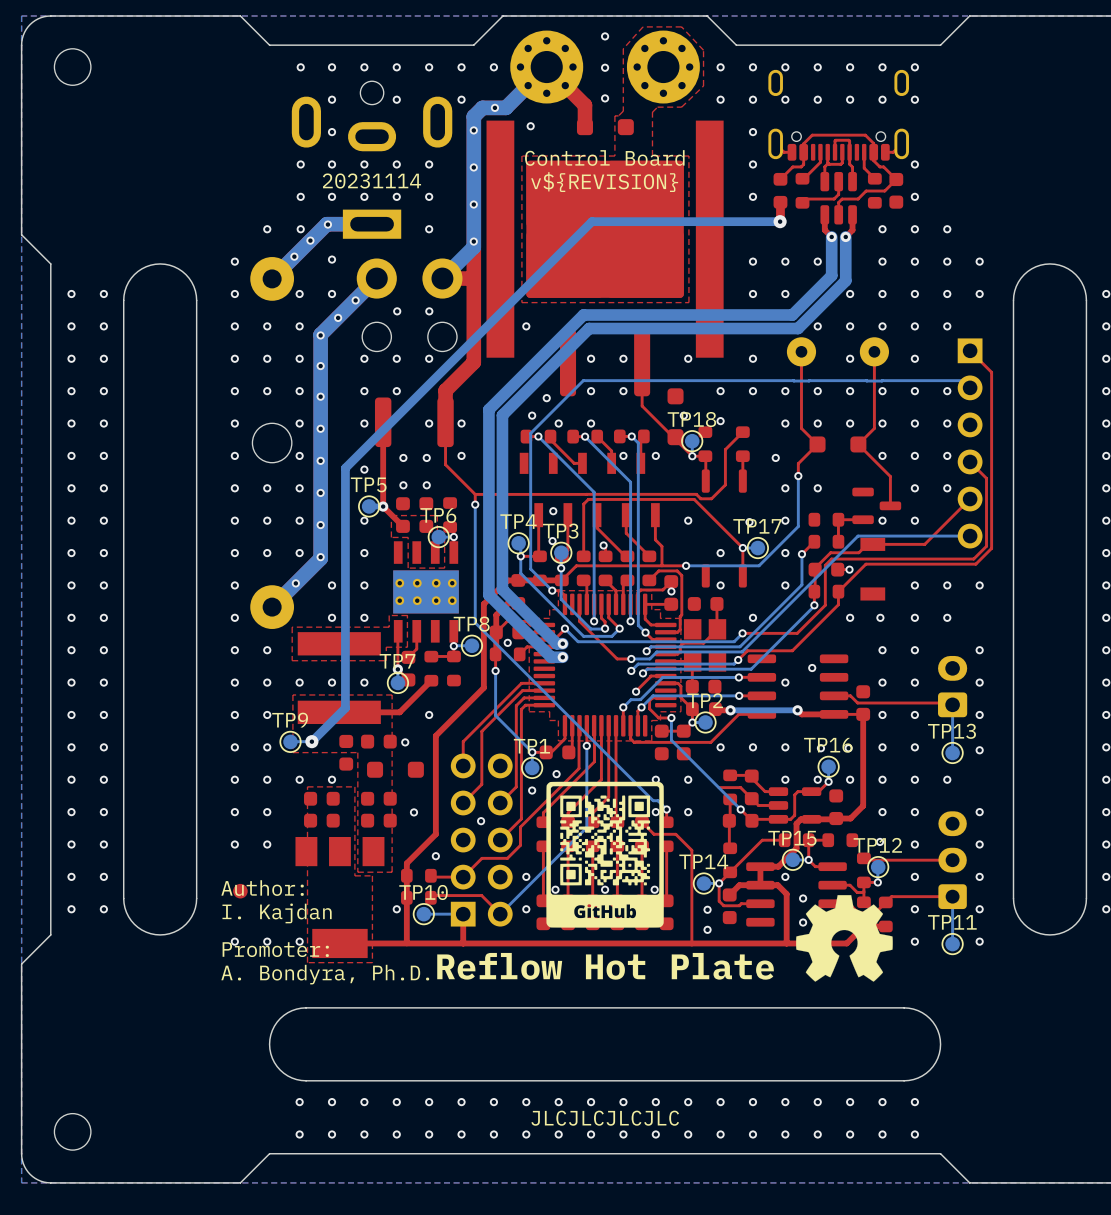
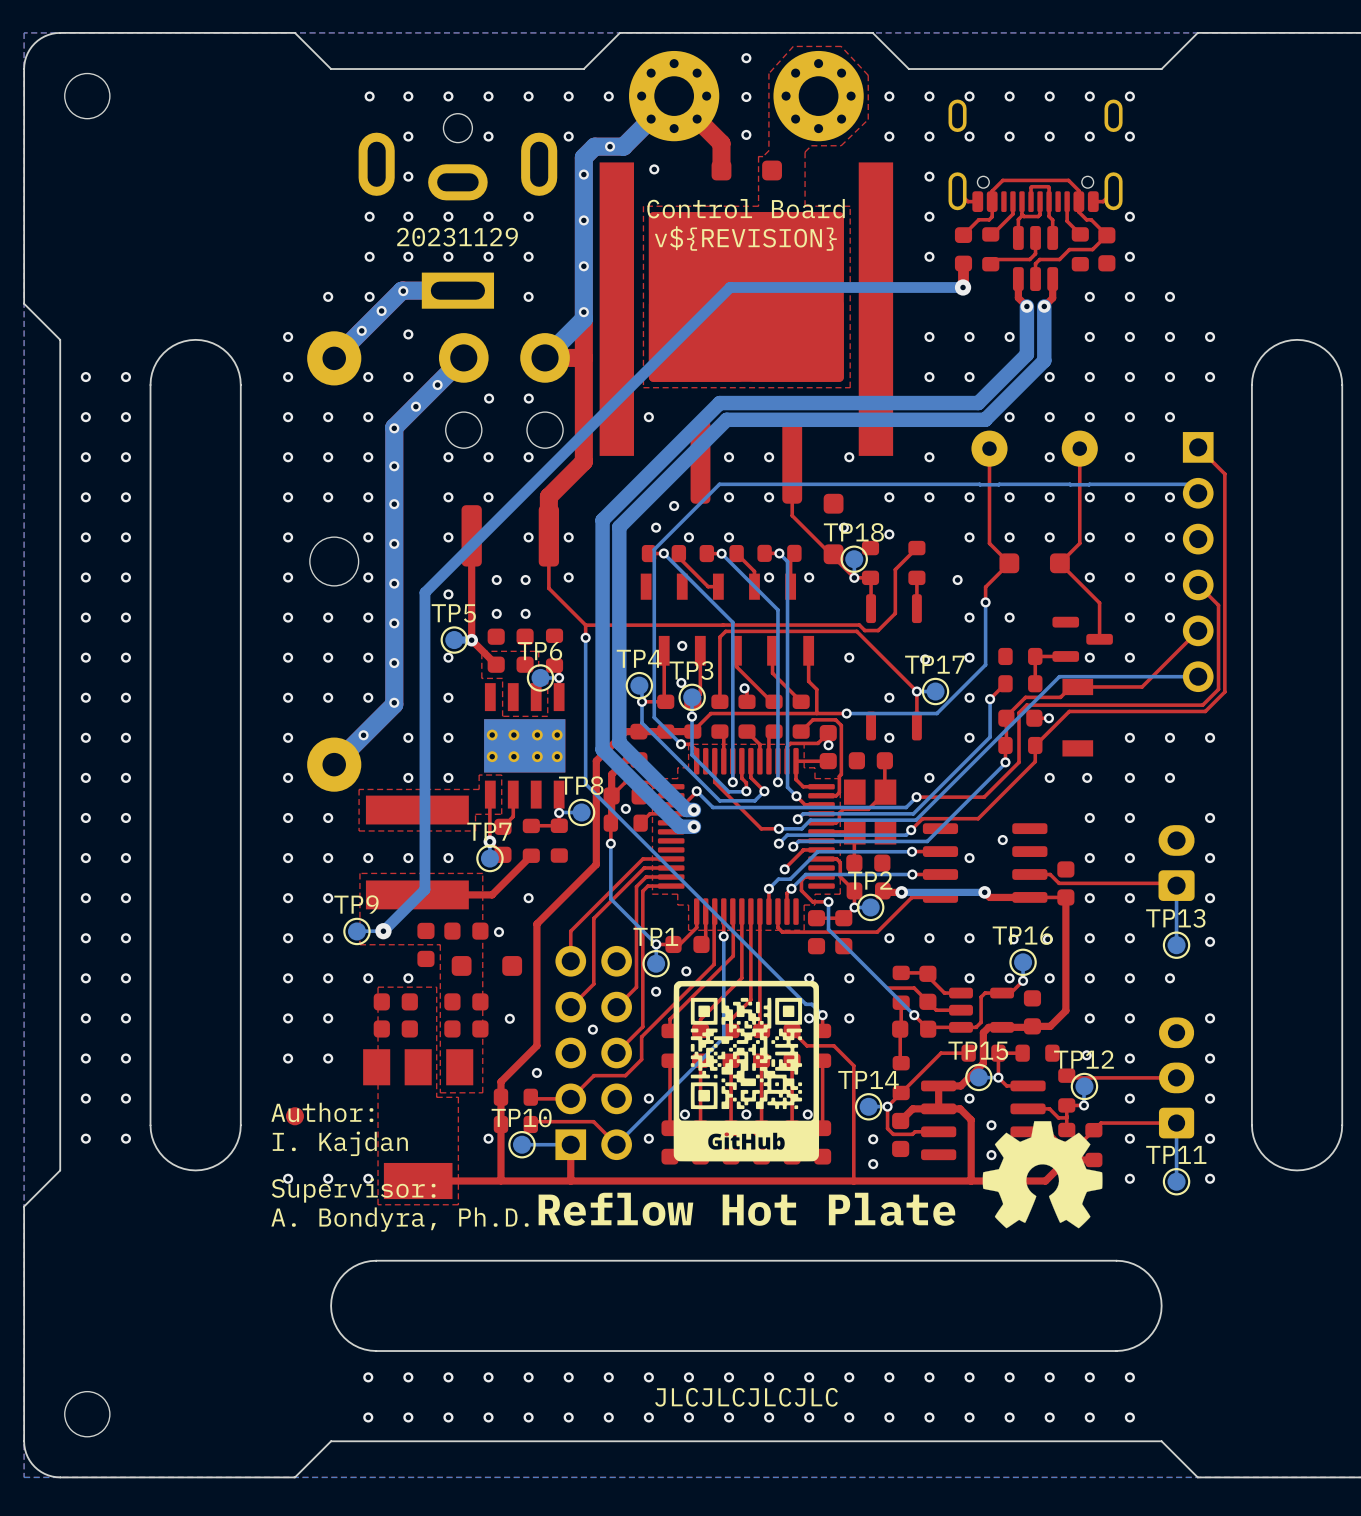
text: 20231114 (371, 180) -> 20231129 (457, 237)
text: Promoter: (275, 949) -> Supervisor: (353, 1190)

